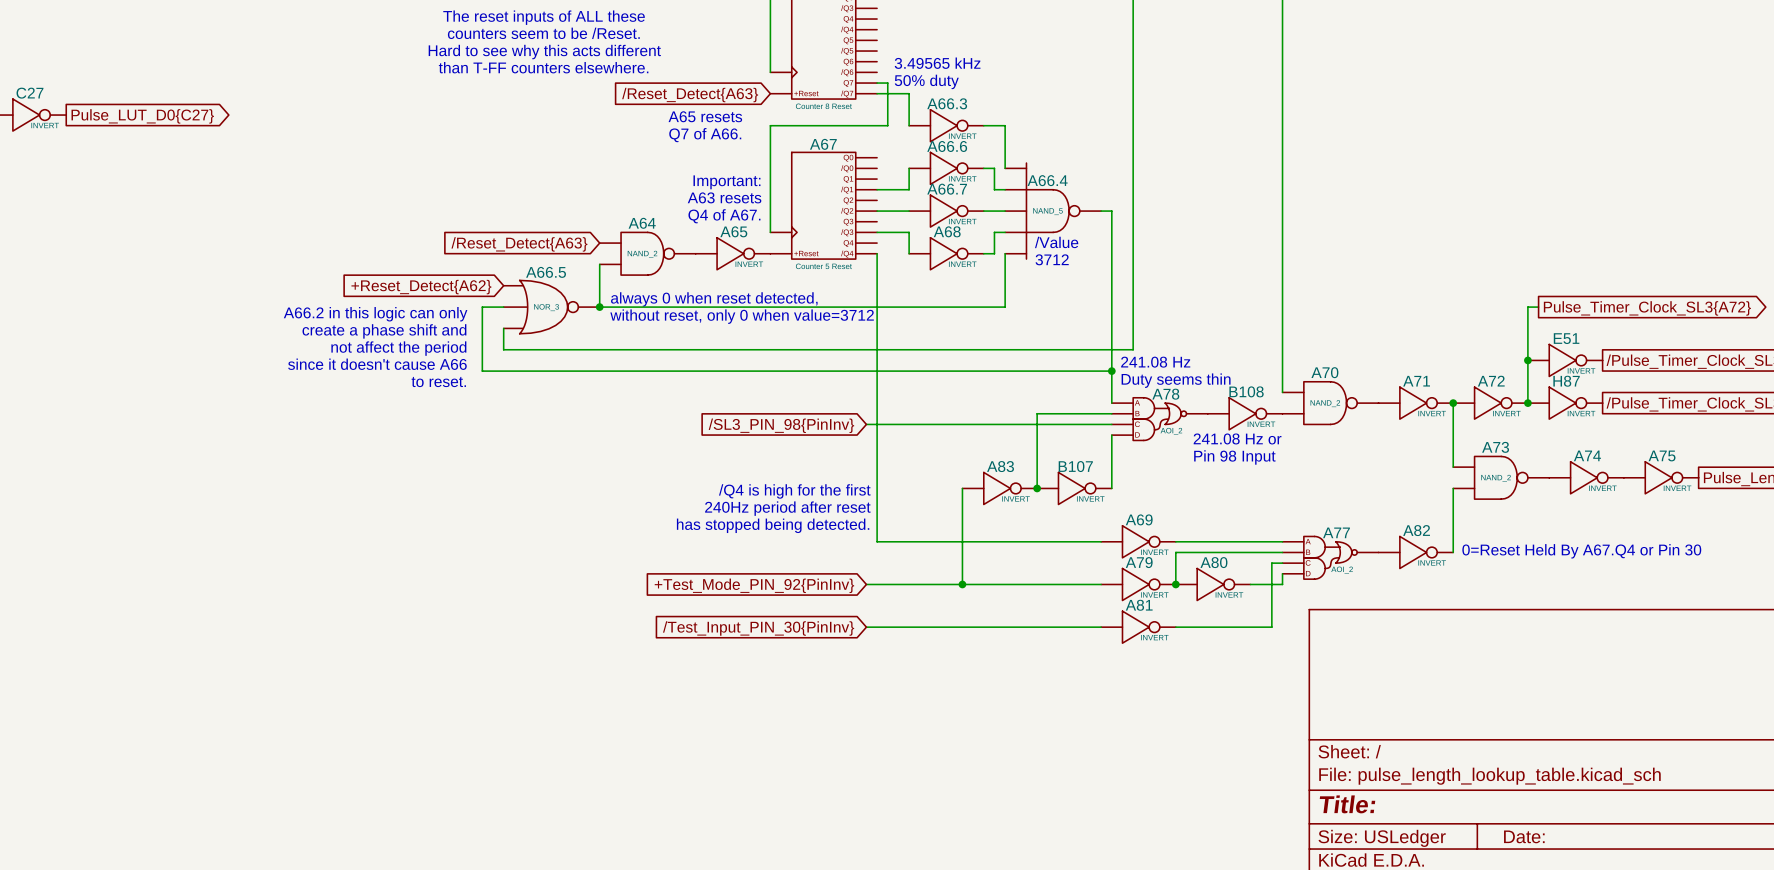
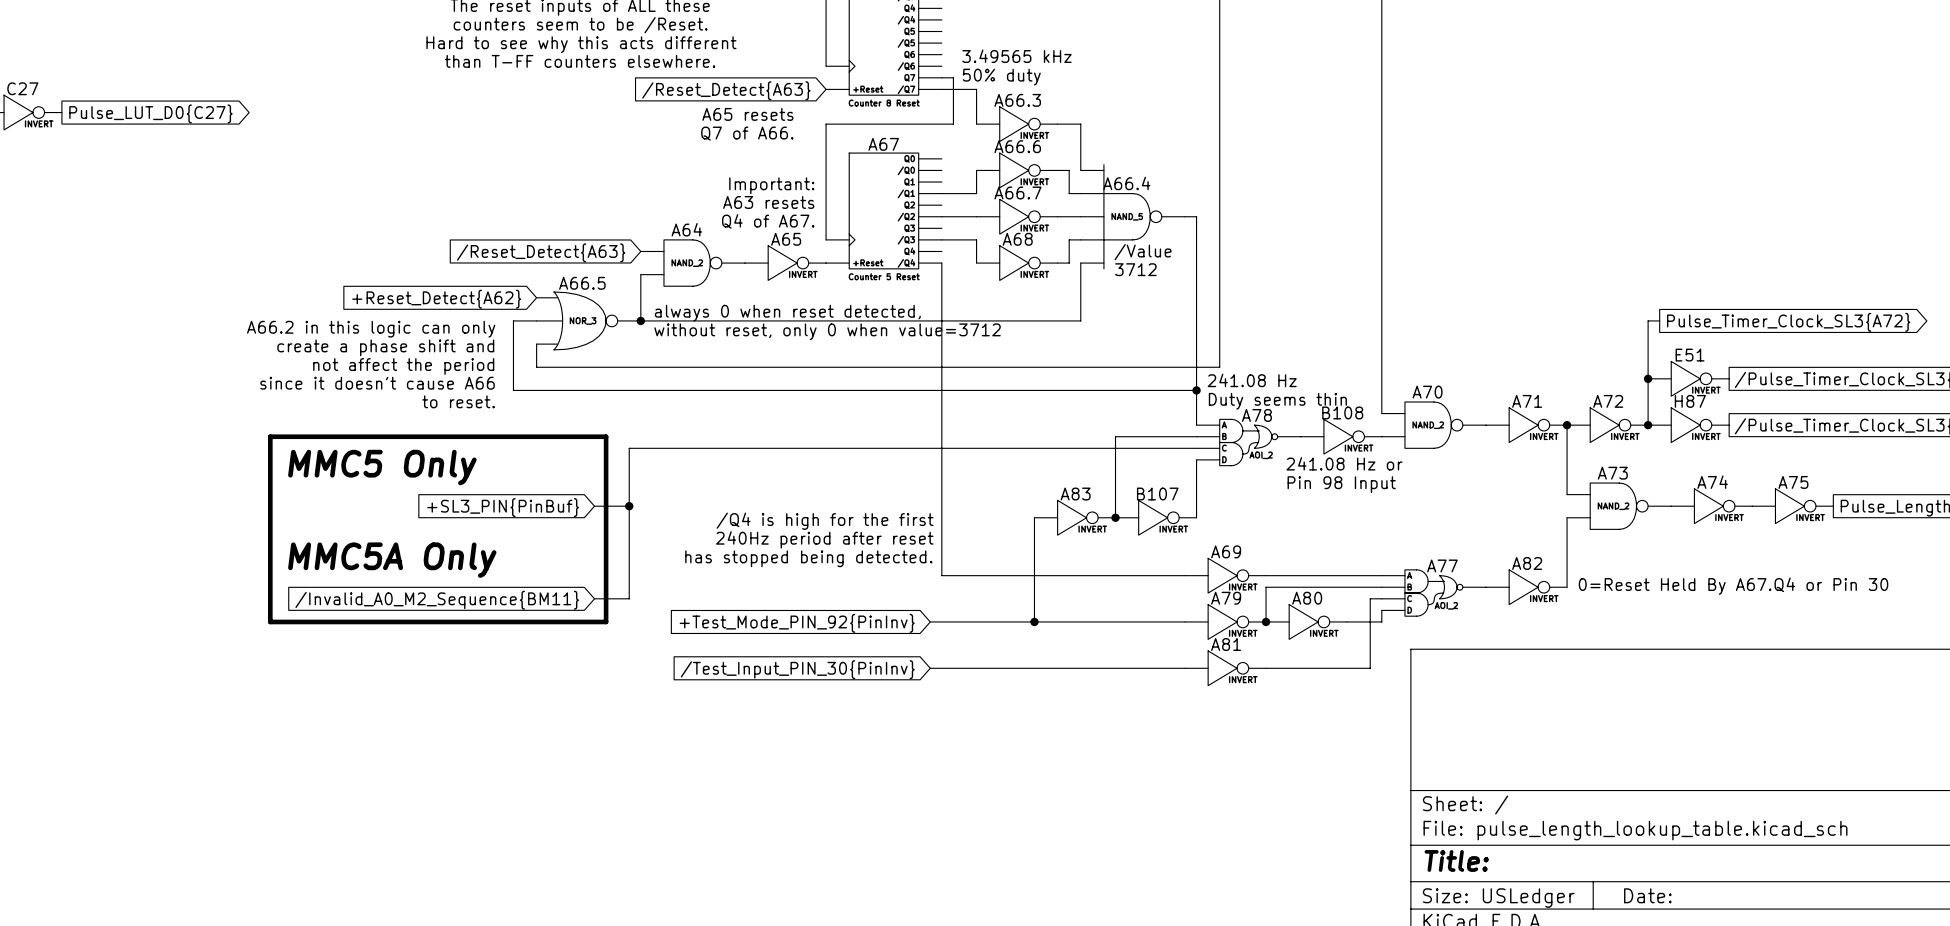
line: none -> (270, 436) (606, 436) (606, 621) (270, 621) (270, 436)
wire: none -> (930, 448) (629, 448) (629, 598) (594, 598)
global label: /SL3_PIN_98{PinInv} (781, 425) -> none
text: none -> MMC5 Only (382, 467)
wire: none -> (594, 506) (629, 506)
junction: none -> (629, 506)
global label: none -> +SL3_PIN{PinBuf} (503, 507)
text: none -> MMC5A Only (392, 560)
global label: none -> /Invalid_A0_M2_Sequence{BM11} (437, 600)

